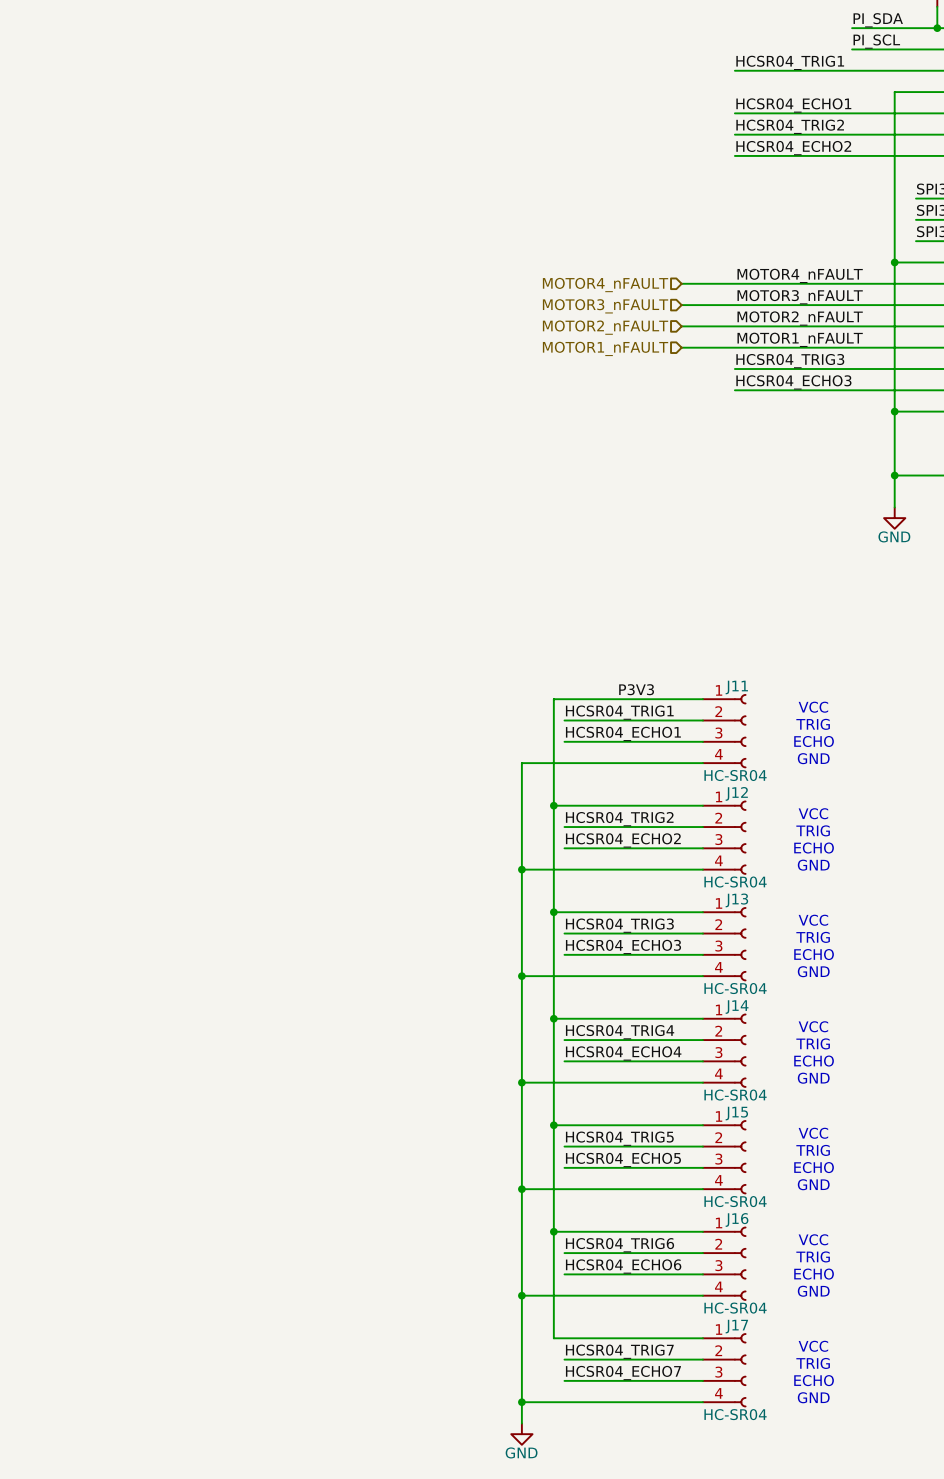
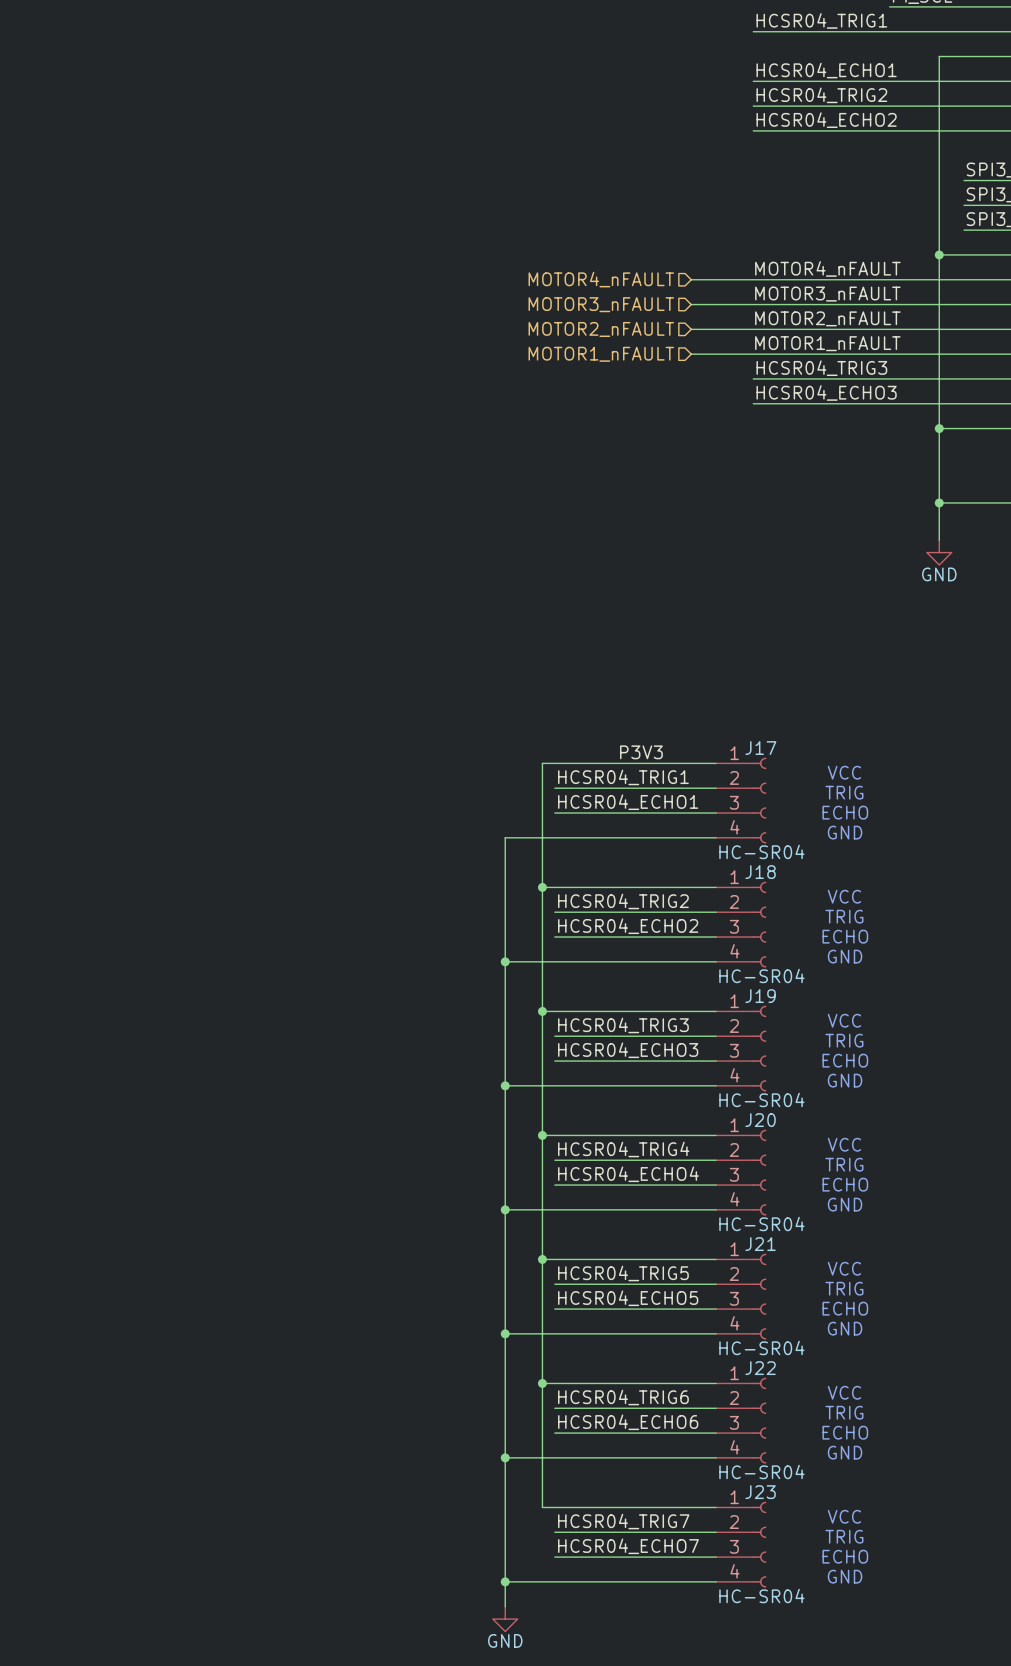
J11 name: J11 (736, 687) -> J17 (760, 748)
J12 name: J12 (736, 793) -> J18 (760, 872)
J13 name: J13 (736, 900) -> J19 (760, 996)
J14 name: J14 (737, 1007) -> J20 (760, 1120)
J15 name: J15 (736, 1113) -> J21 (760, 1244)
J16 name: J16 (737, 1219) -> J22 (760, 1368)
J17 name: J17 (736, 1326) -> J23 (760, 1492)

